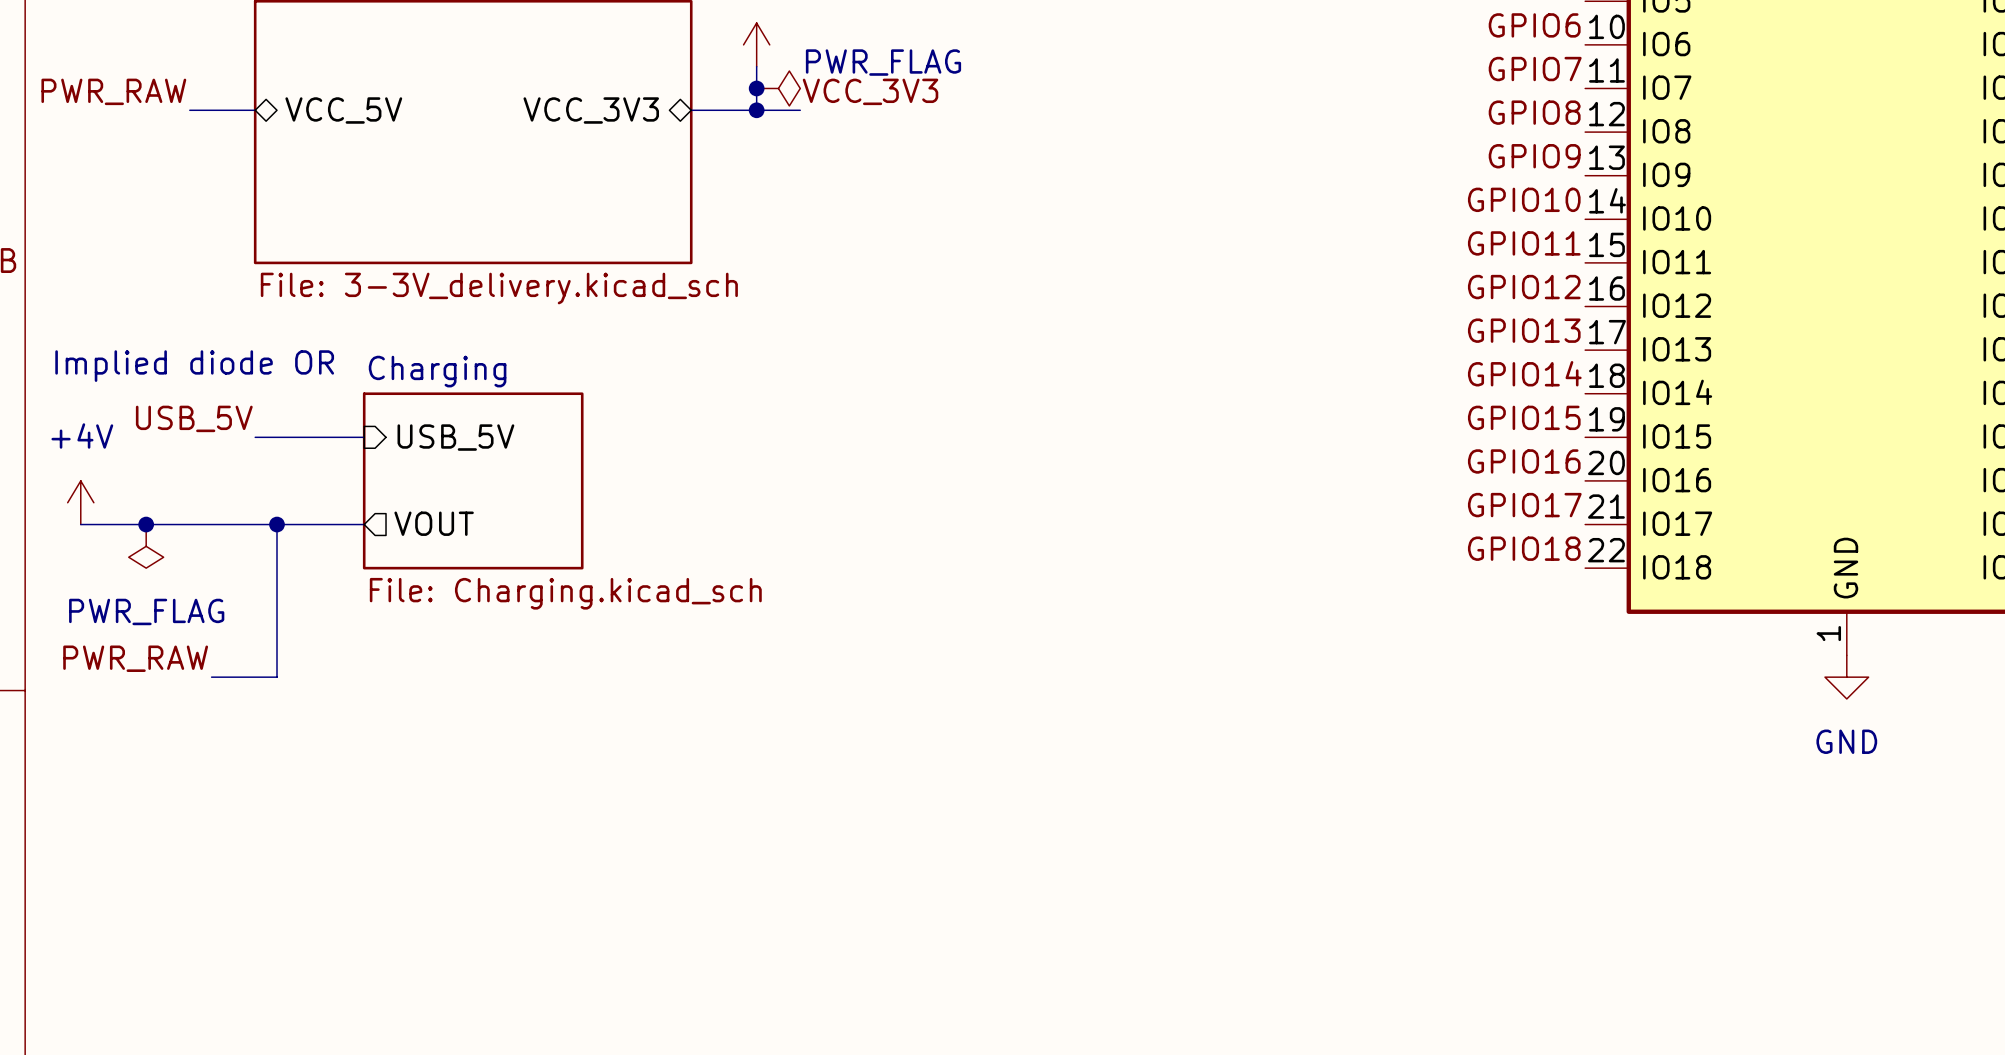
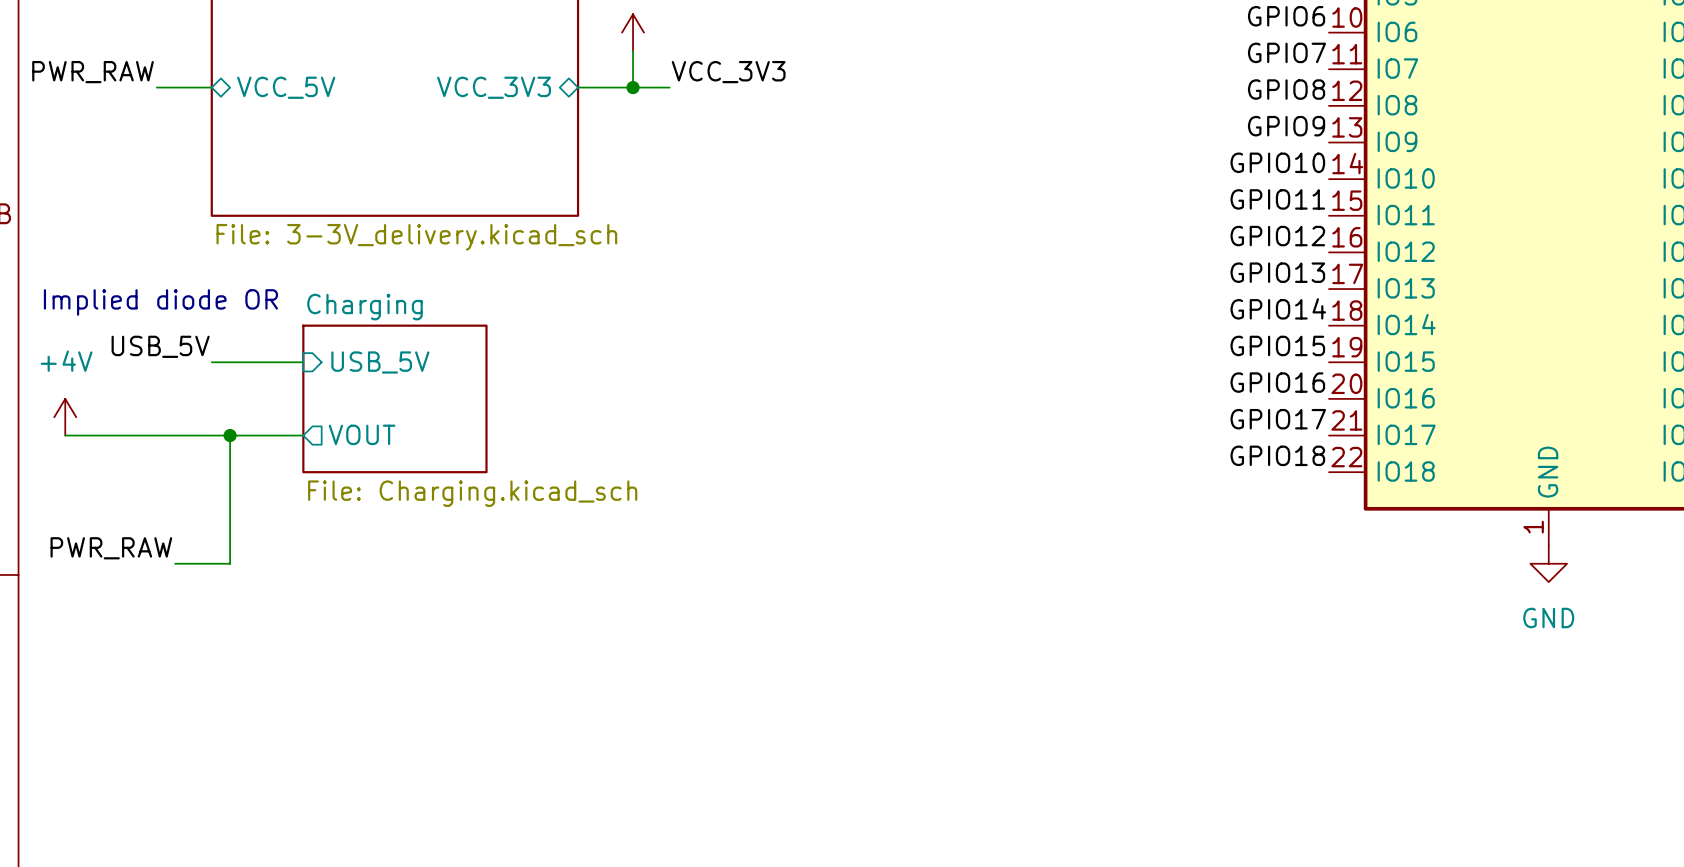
junction: (756, 88) -> none
power symbol: PWR_FLAG (778, 88) -> none
junction: (146, 524) -> none
power symbol: PWR_FLAG (146, 546) -> none

